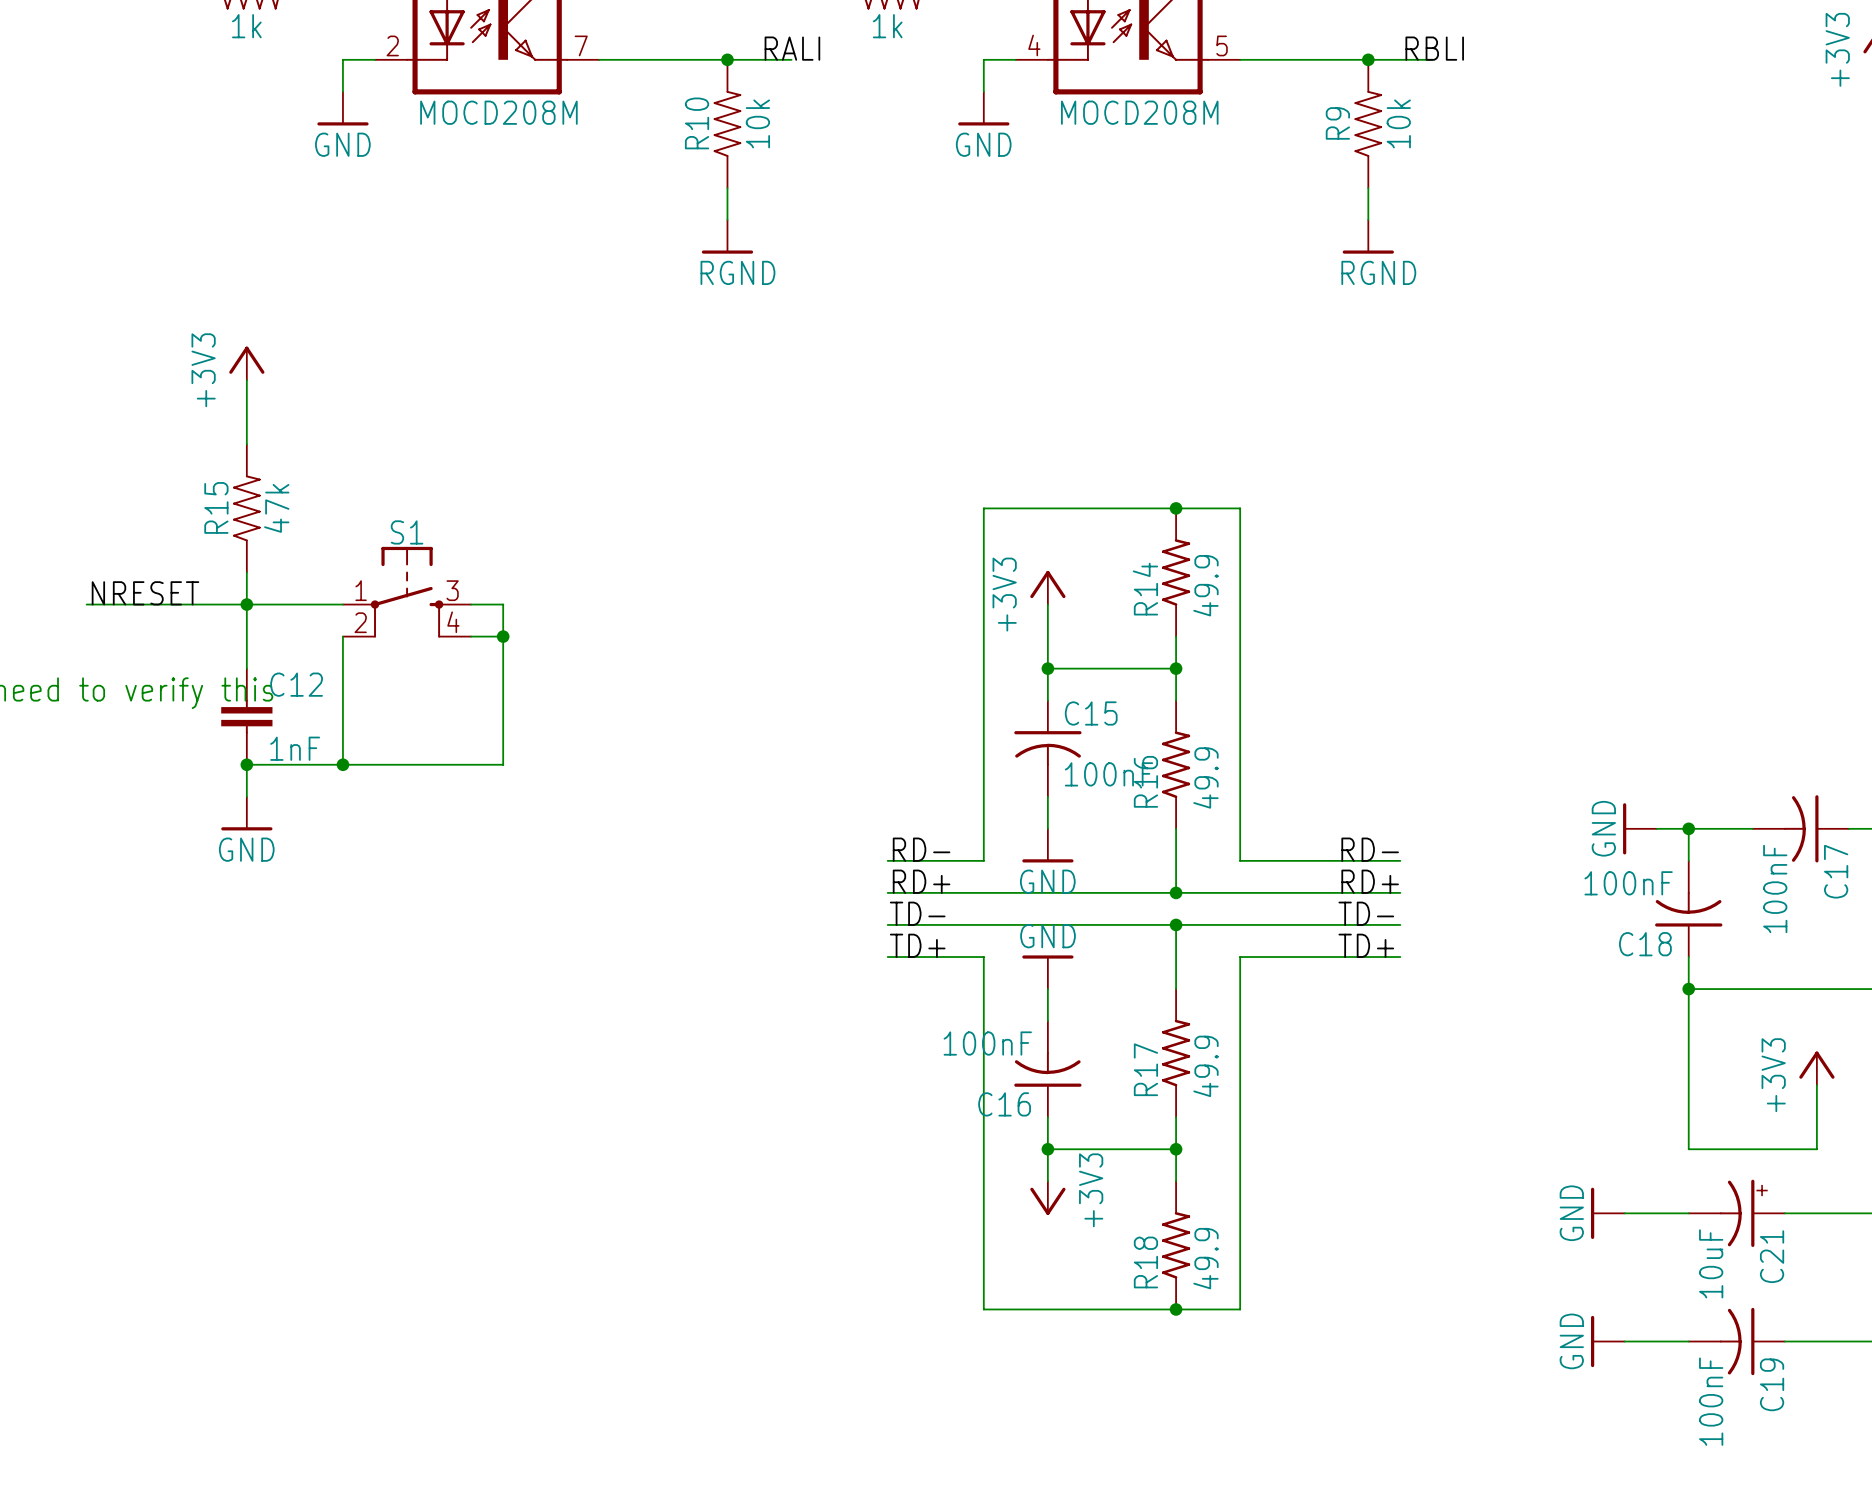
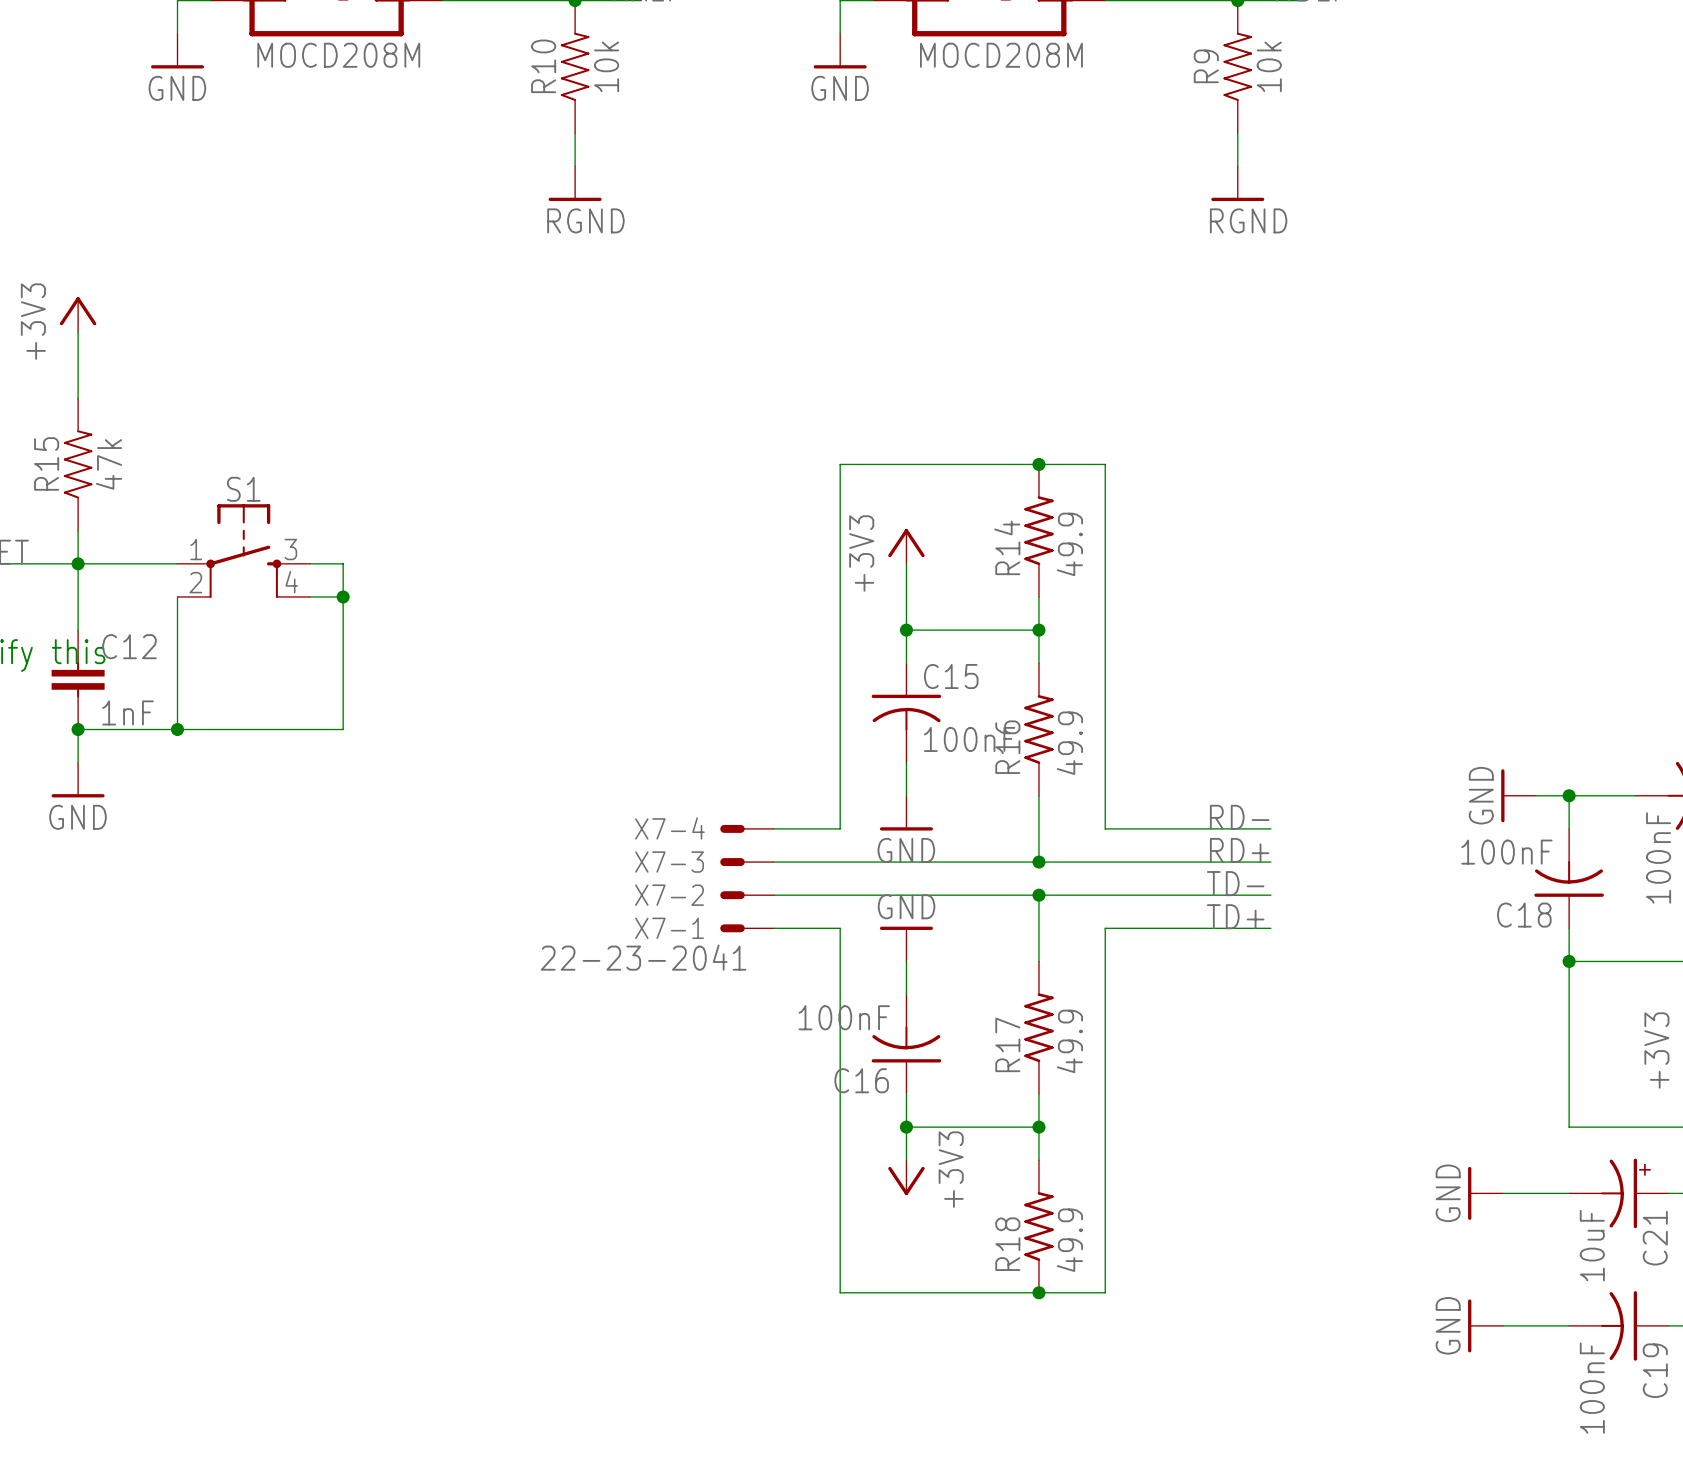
label: RD- (921, 849) -> none
X7-4: none -> (747, 828)
label: RD+ (921, 881) -> none
X7-3: none -> (747, 862)
label: TD- (917, 913) -> none
X7-2: none -> (747, 895)
label: TD+ (917, 945) -> none
X7-1: none -> 22-23-2041 (747, 928)

